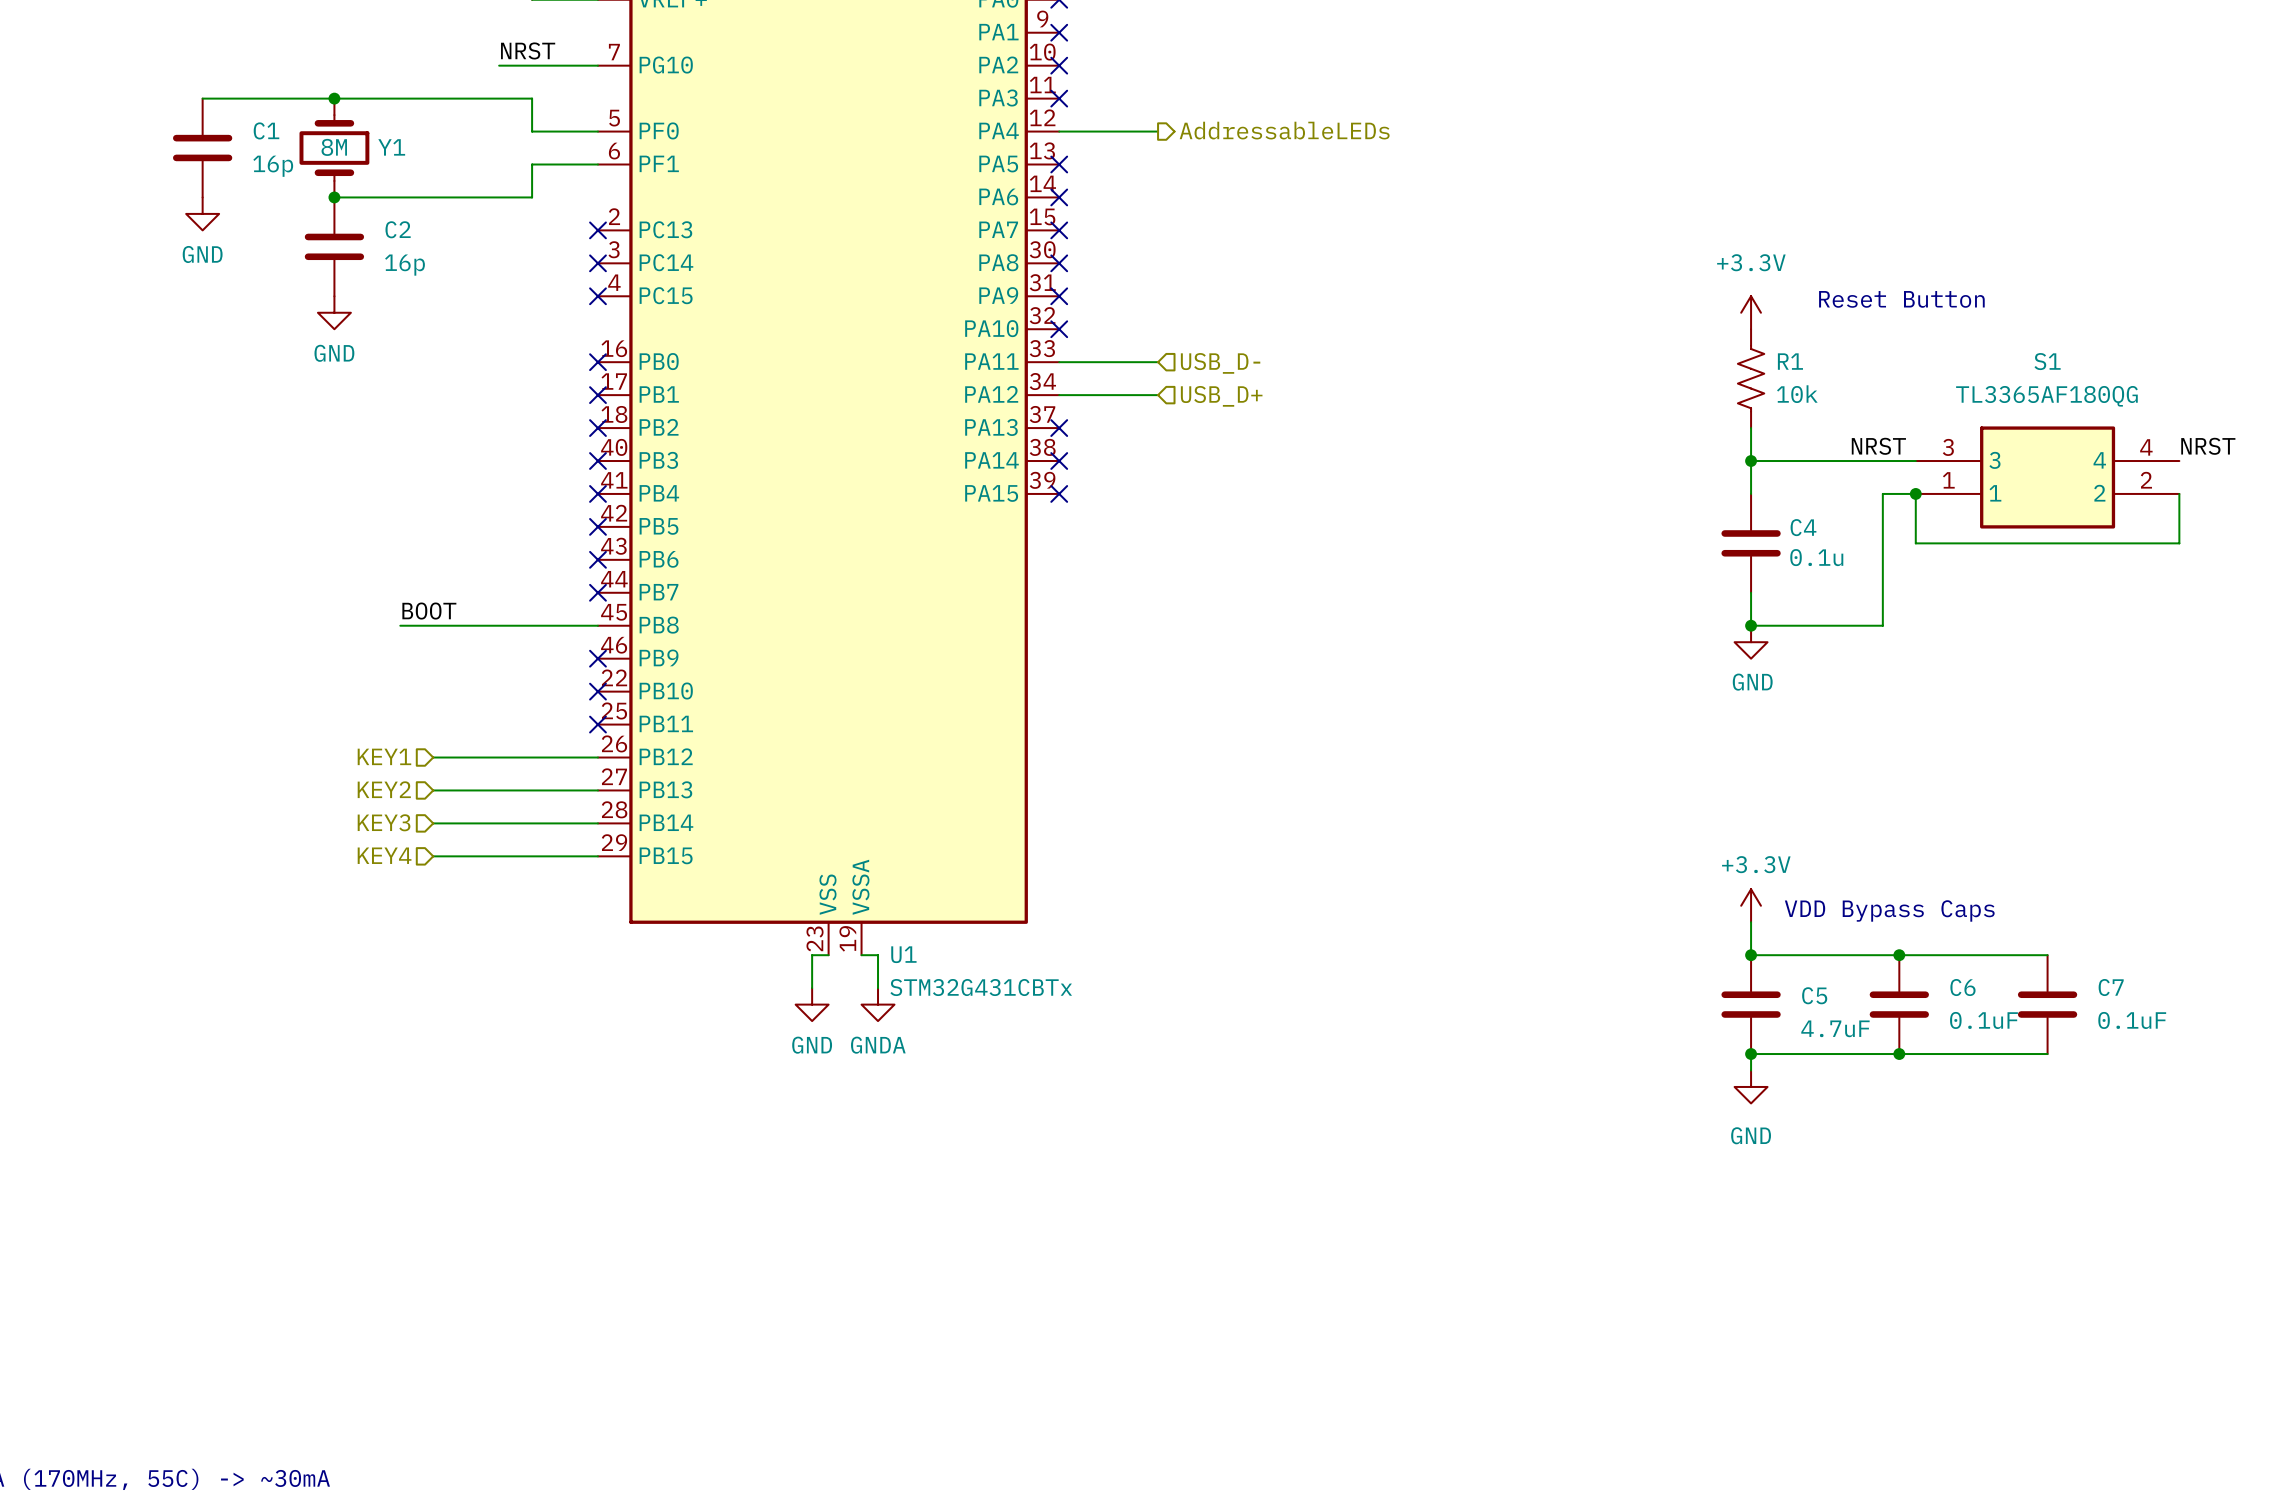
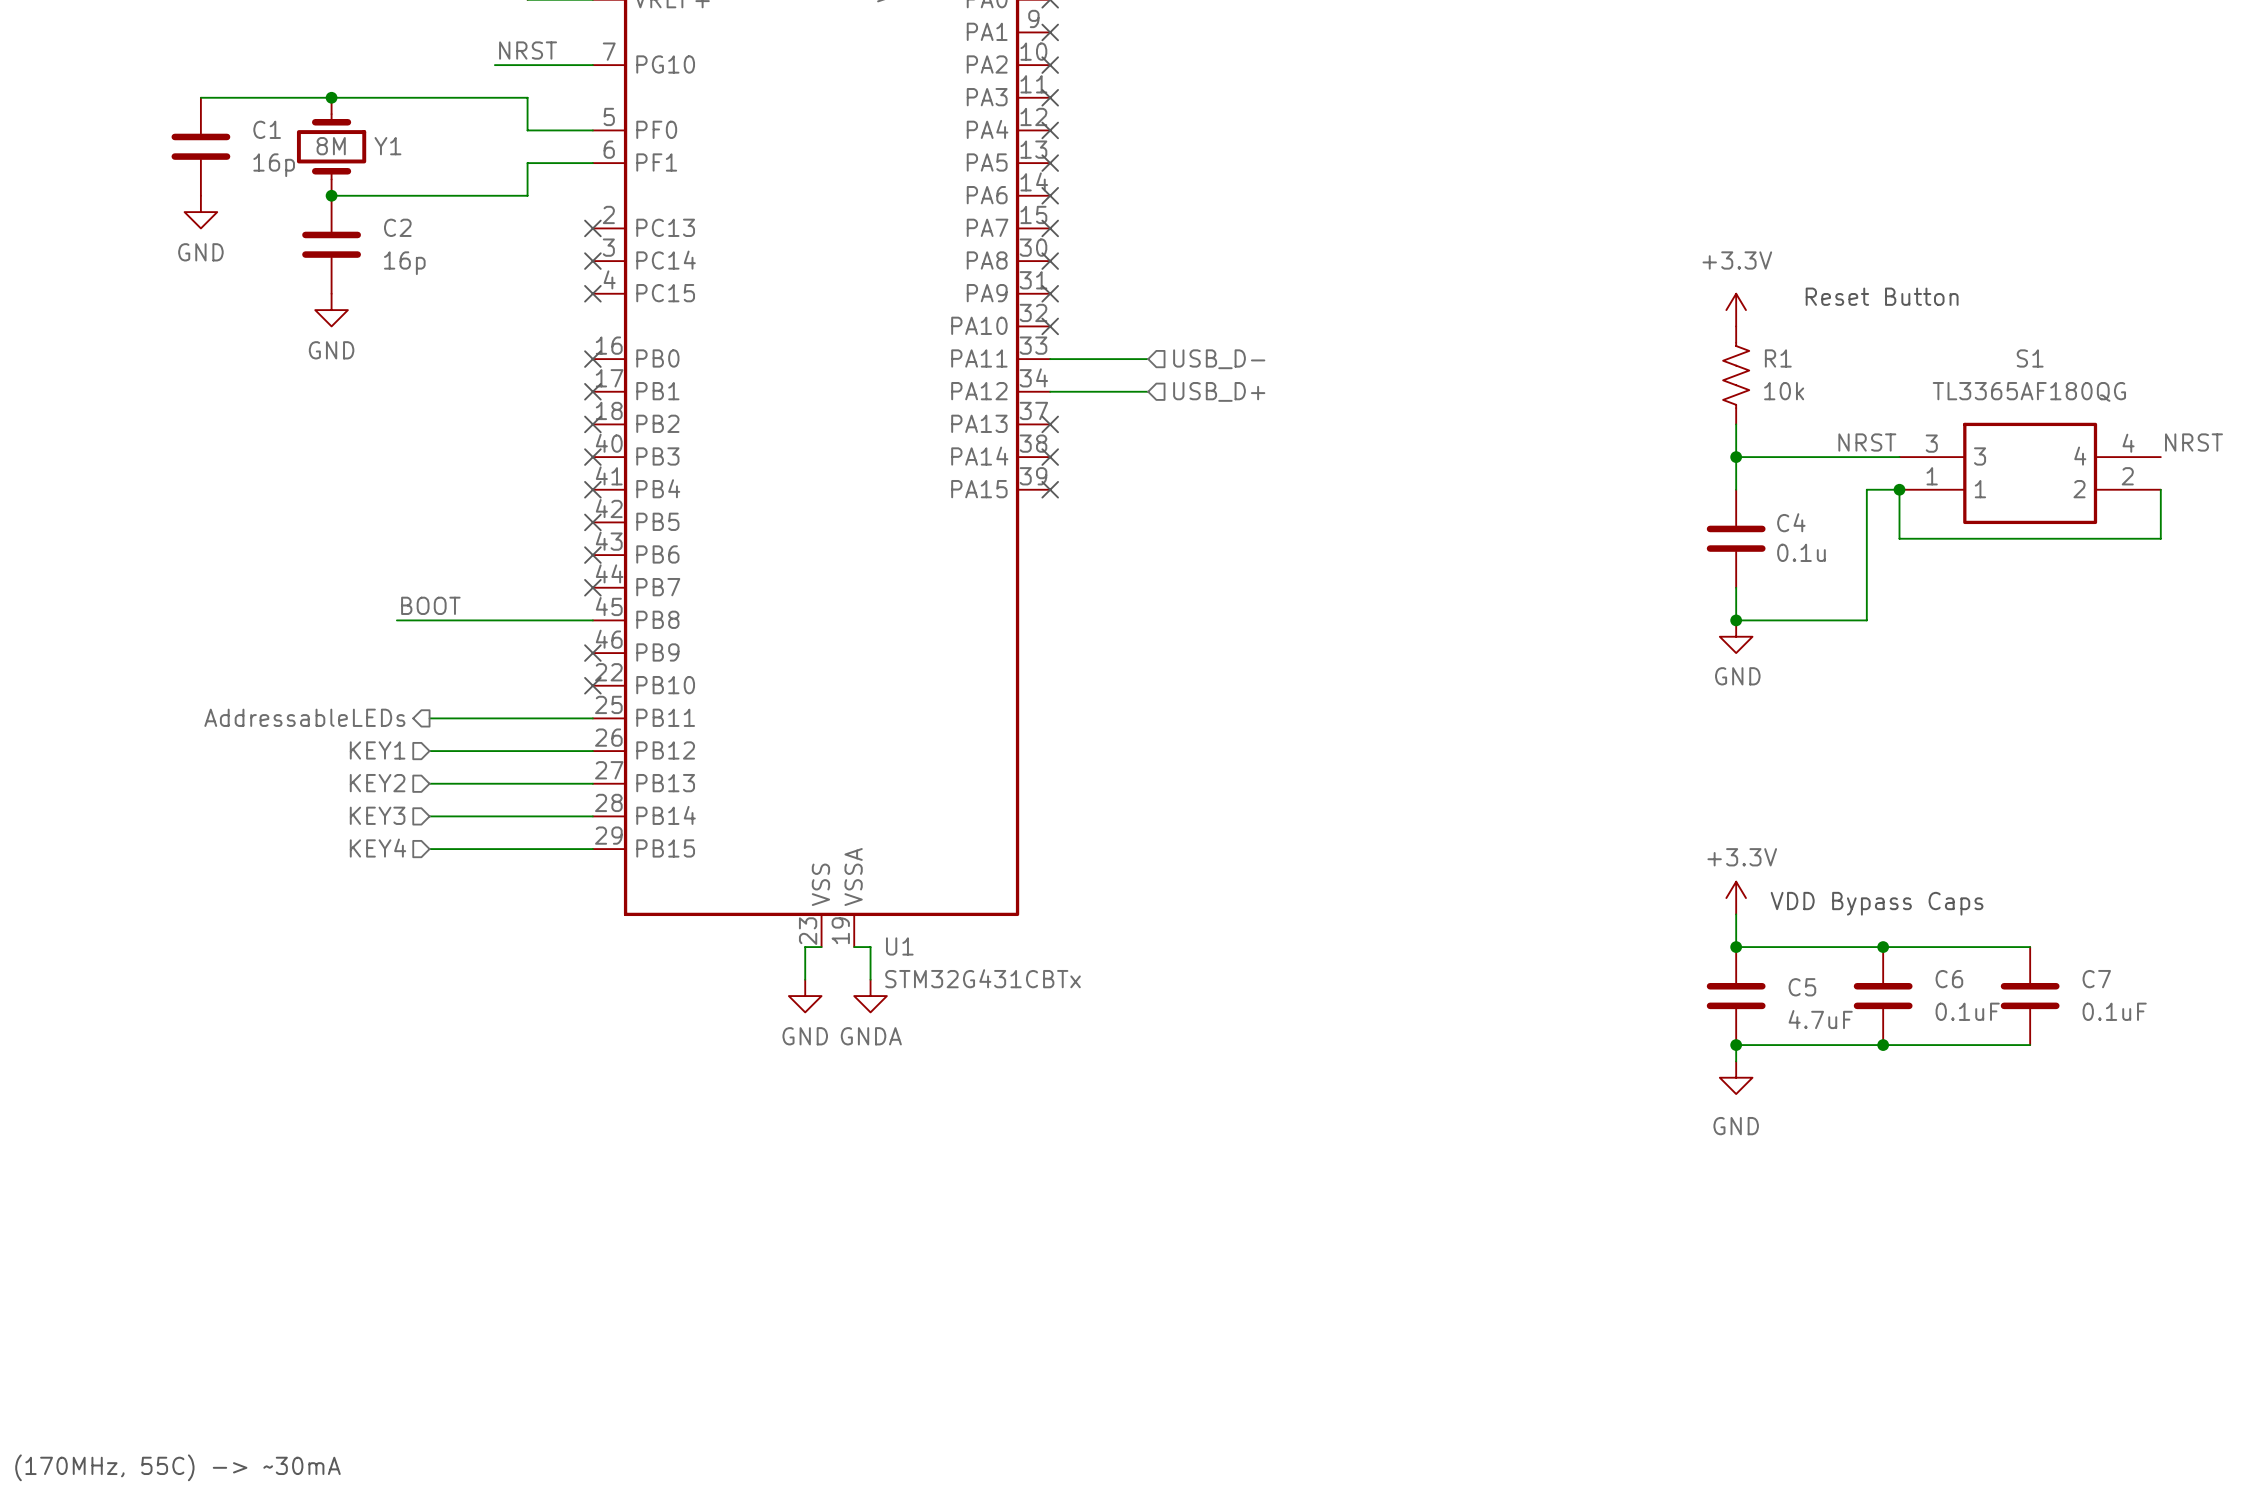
hierarchical label: AddressableLEDs (1284, 130) -> none
wire: (1059, 131) (1158, 131) -> none
no-connect mark: none -> (1050, 130)
hierarchical label: none -> AddressableLEDs (304, 717)
wire: none -> (429, 718) (592, 718)
no-connect mark: (597, 724) -> none

